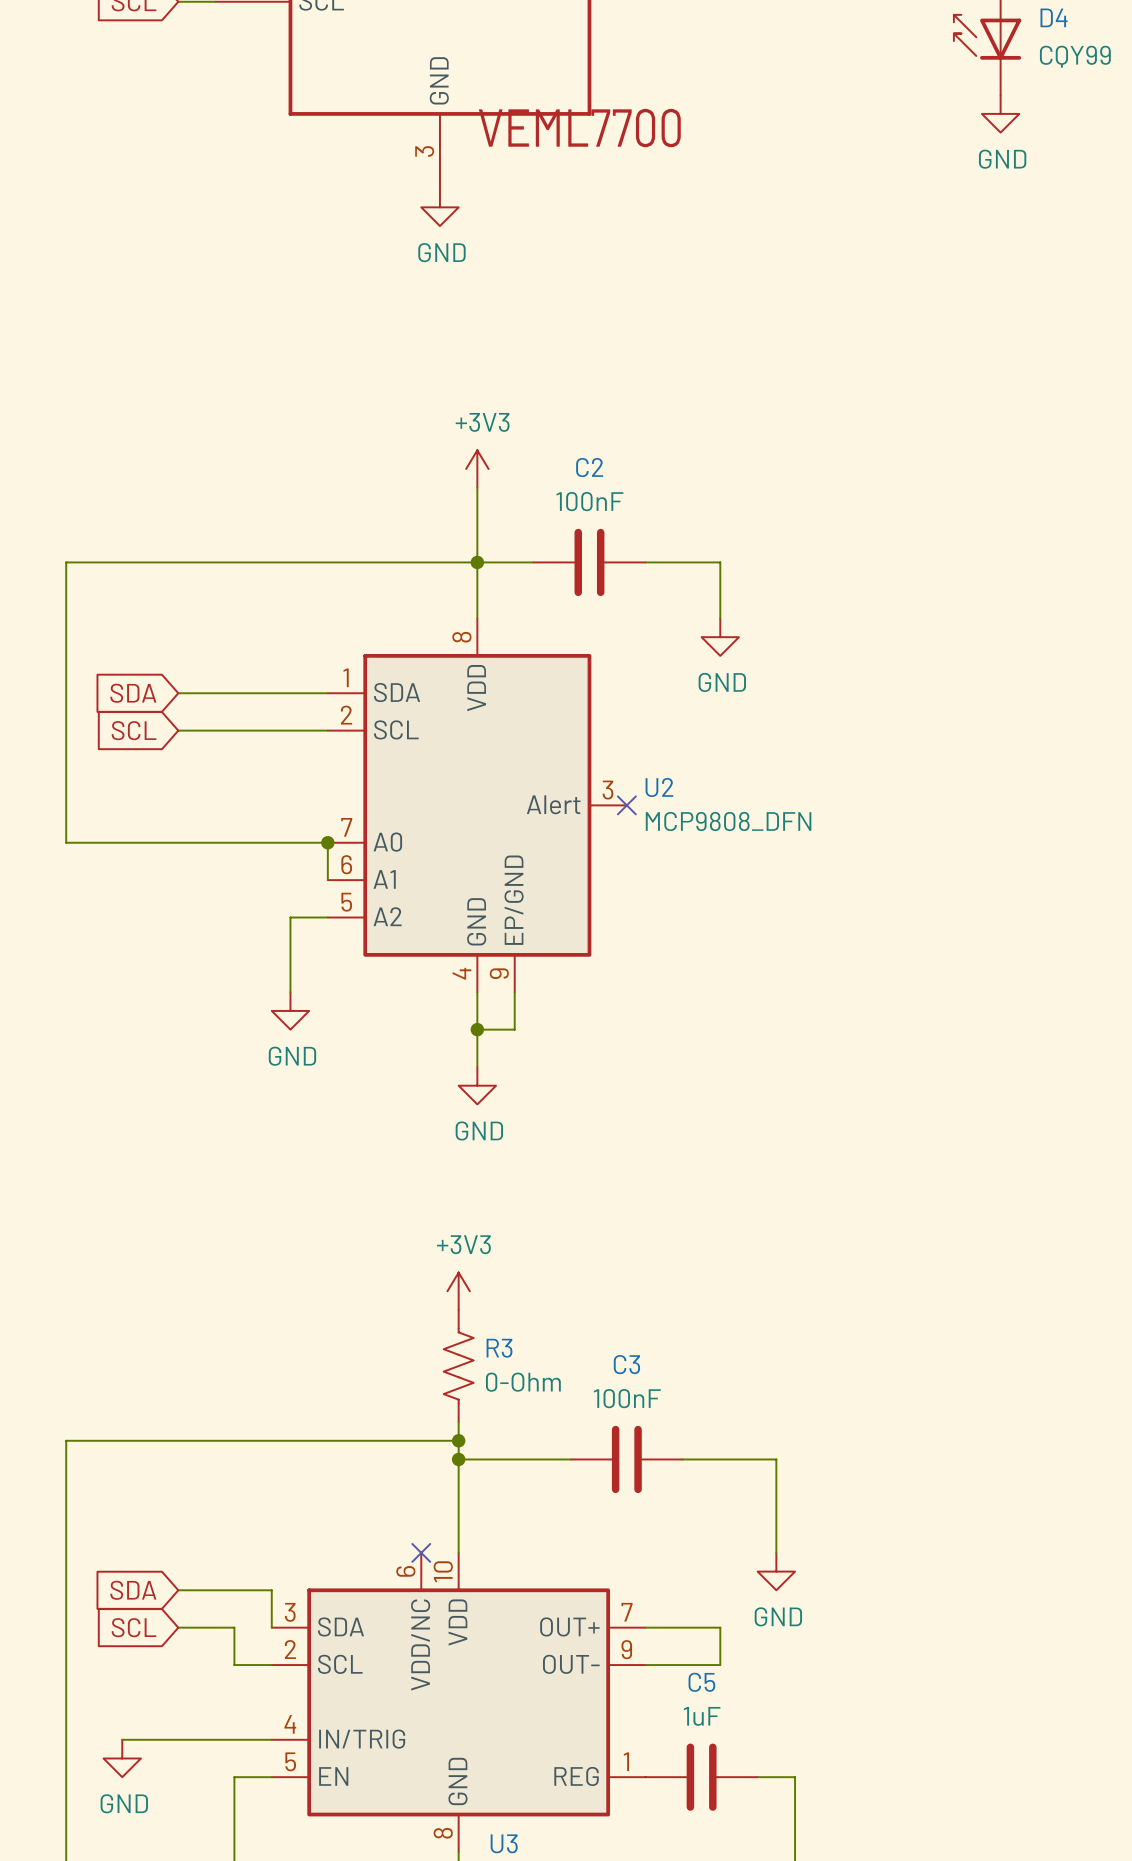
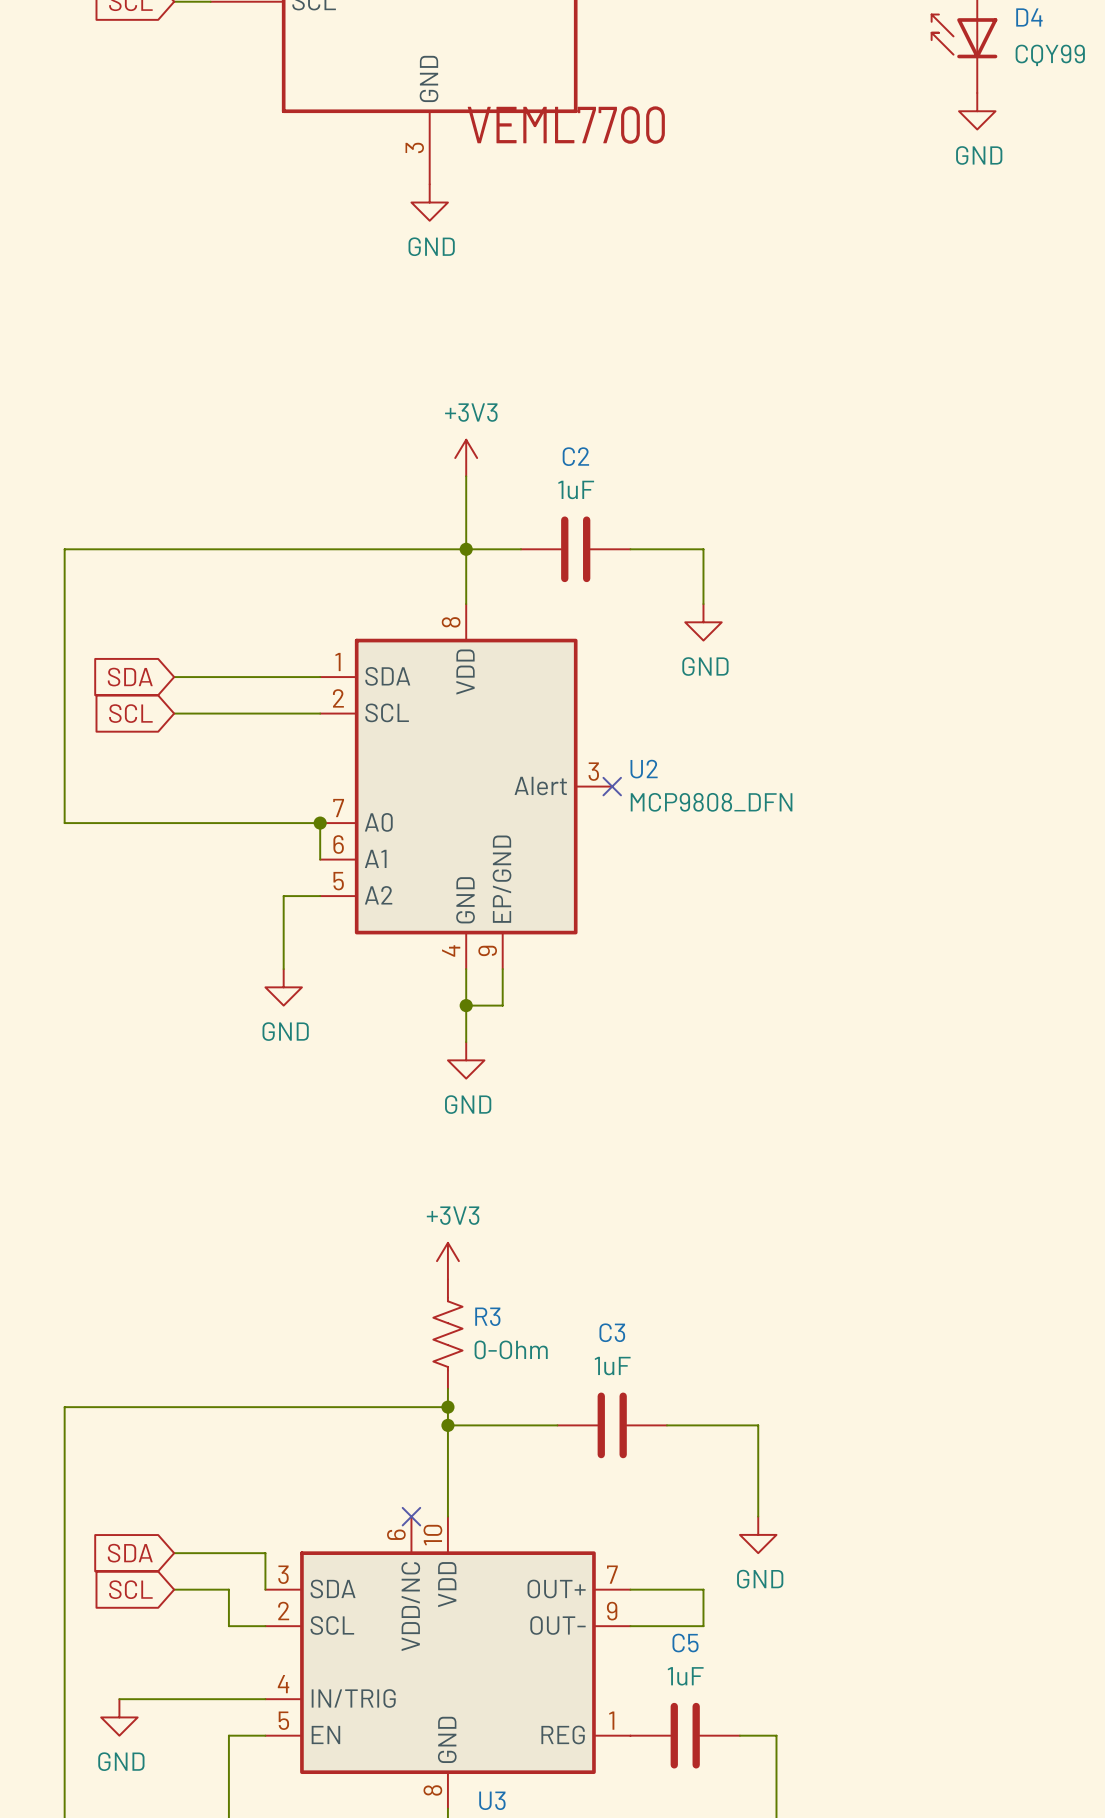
C2 value: 100nF (589, 501) -> 1uF (576, 489)
C3 value: 100nF (627, 1398) -> 1uF (612, 1366)

